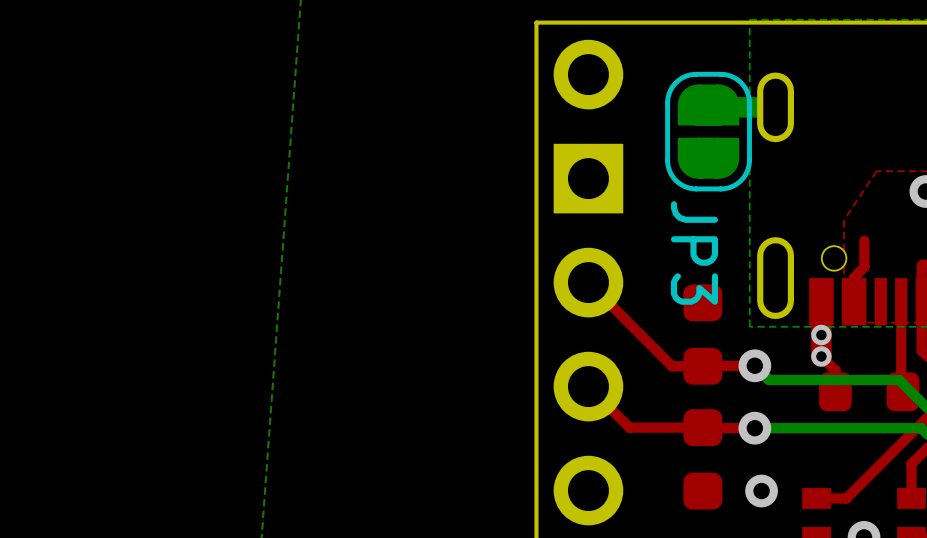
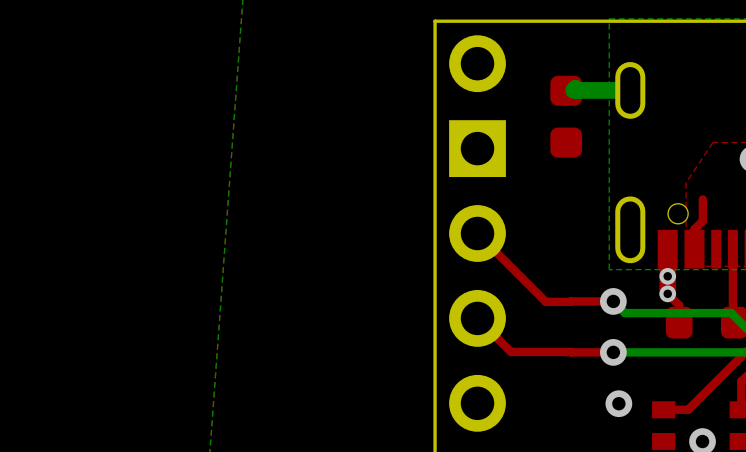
JP3: (708, 131) -> none
part: none -> (566, 116)
part: (702, 334) -> none
part: (702, 459) -> none

